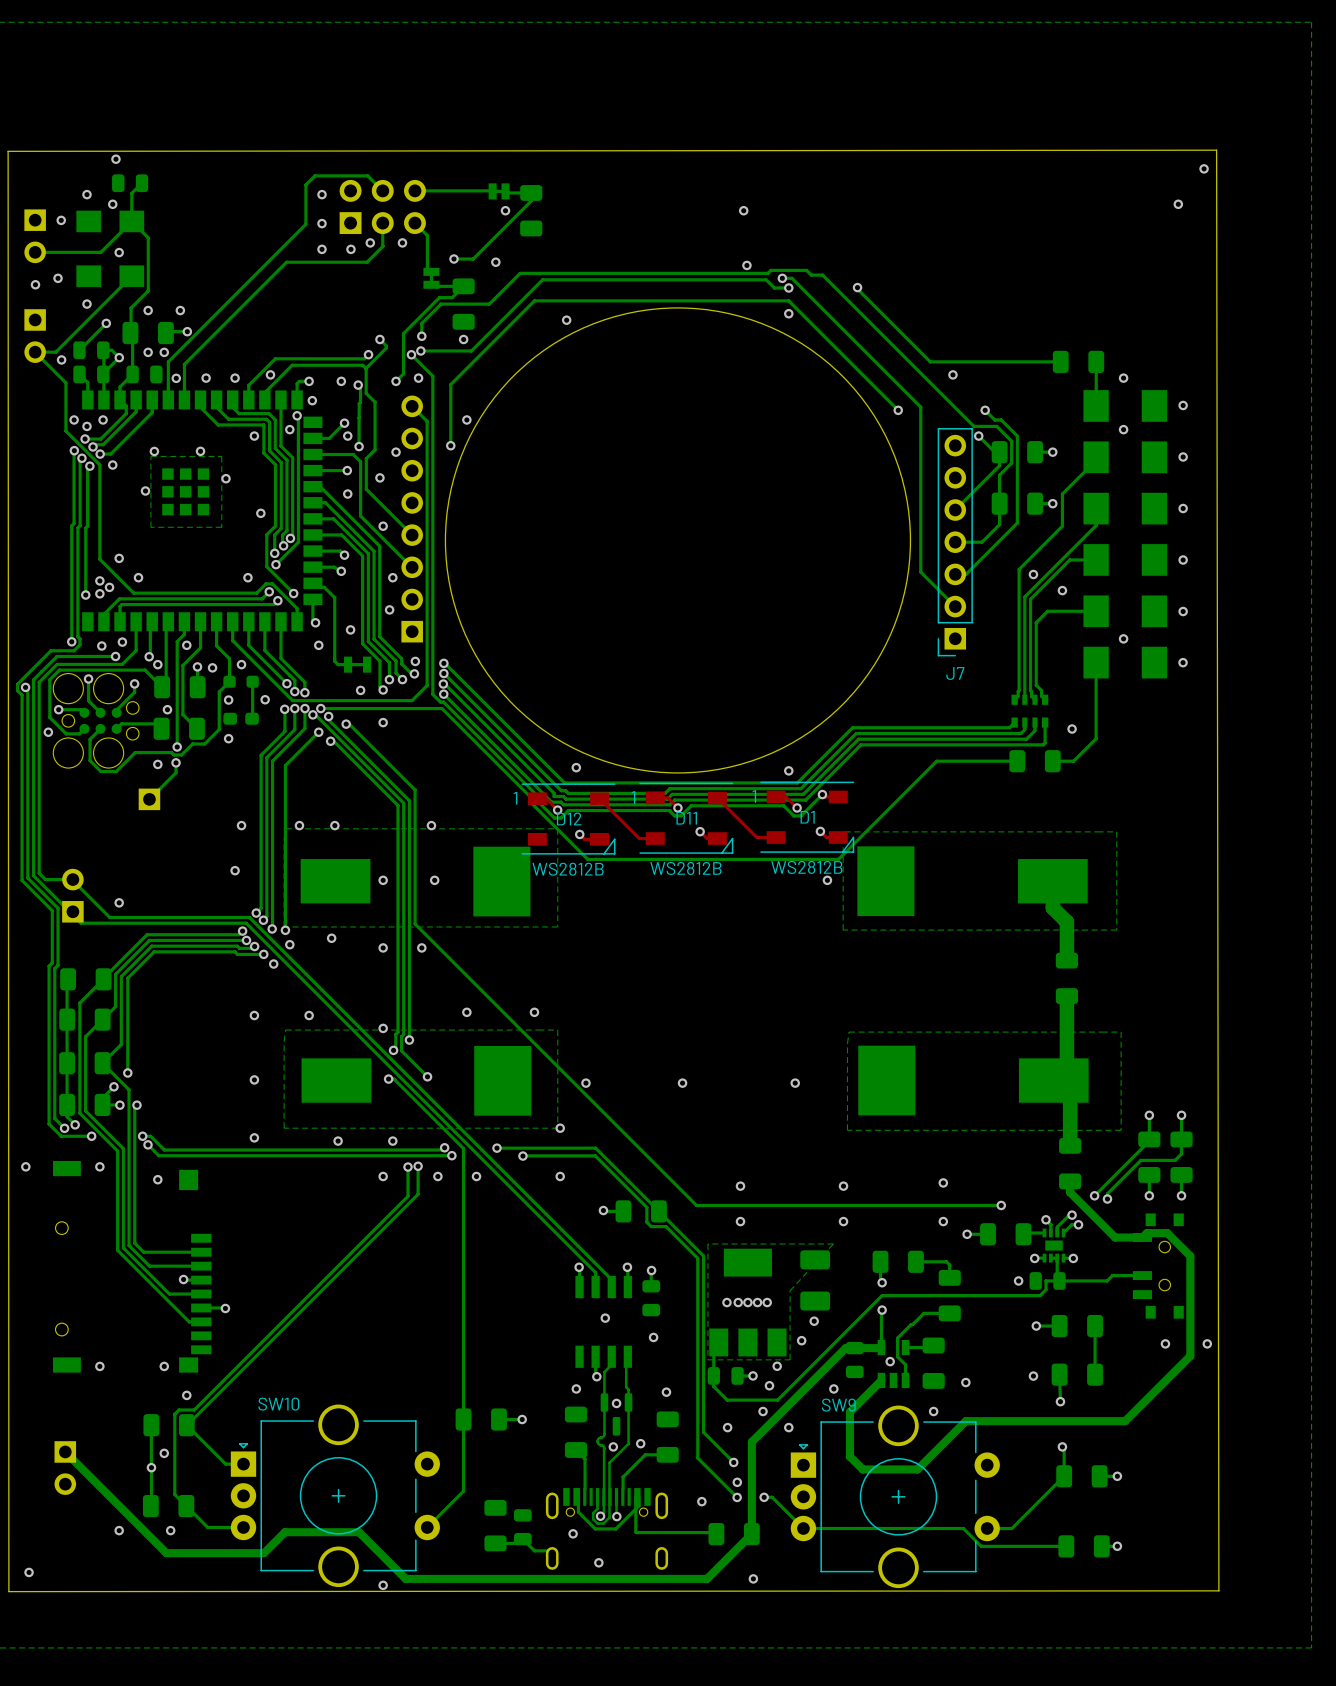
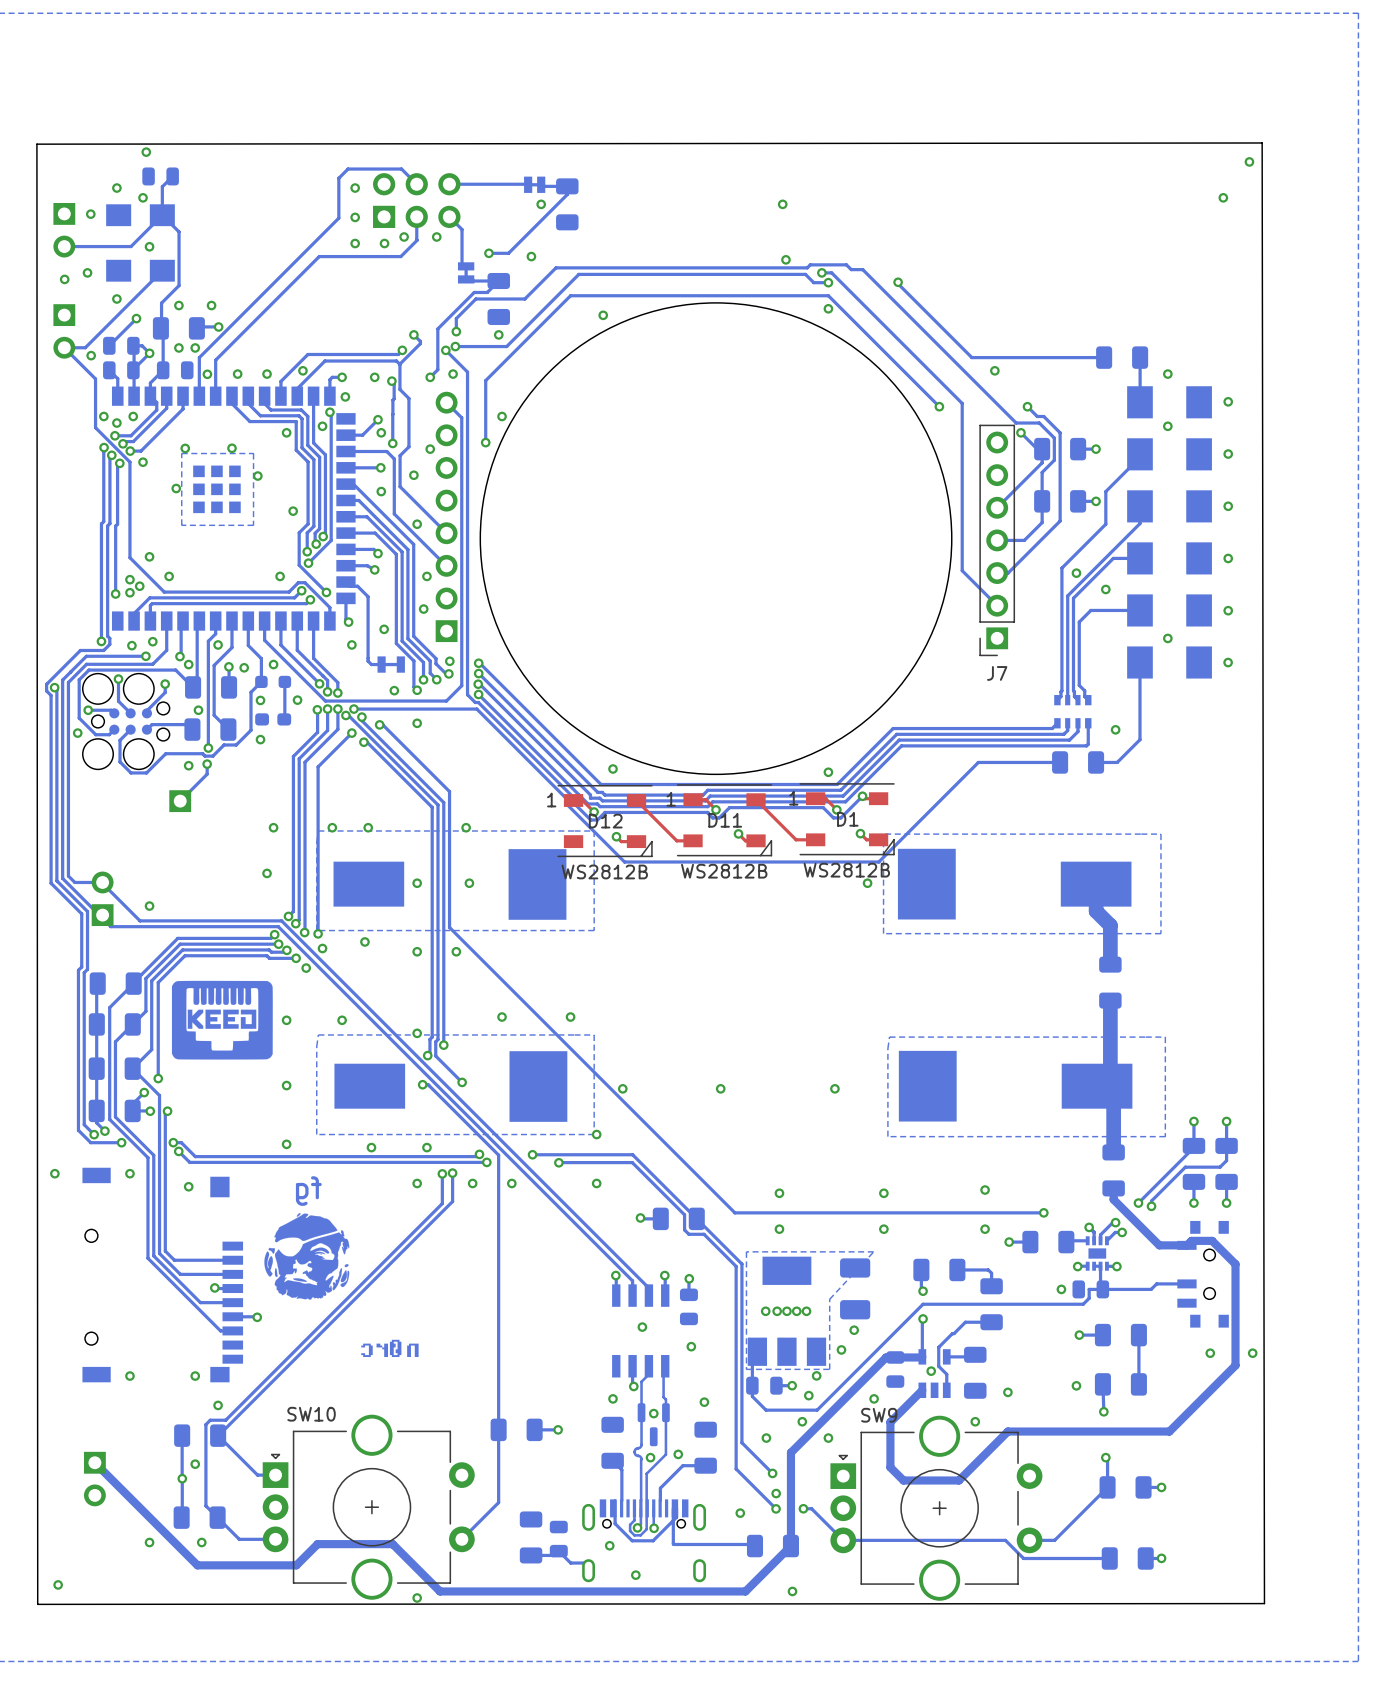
drawing: none -> [171, 980, 273, 1060]
drawing: none -> [264, 1213, 350, 1300]
drawing: none -> [361, 1339, 419, 1358]

